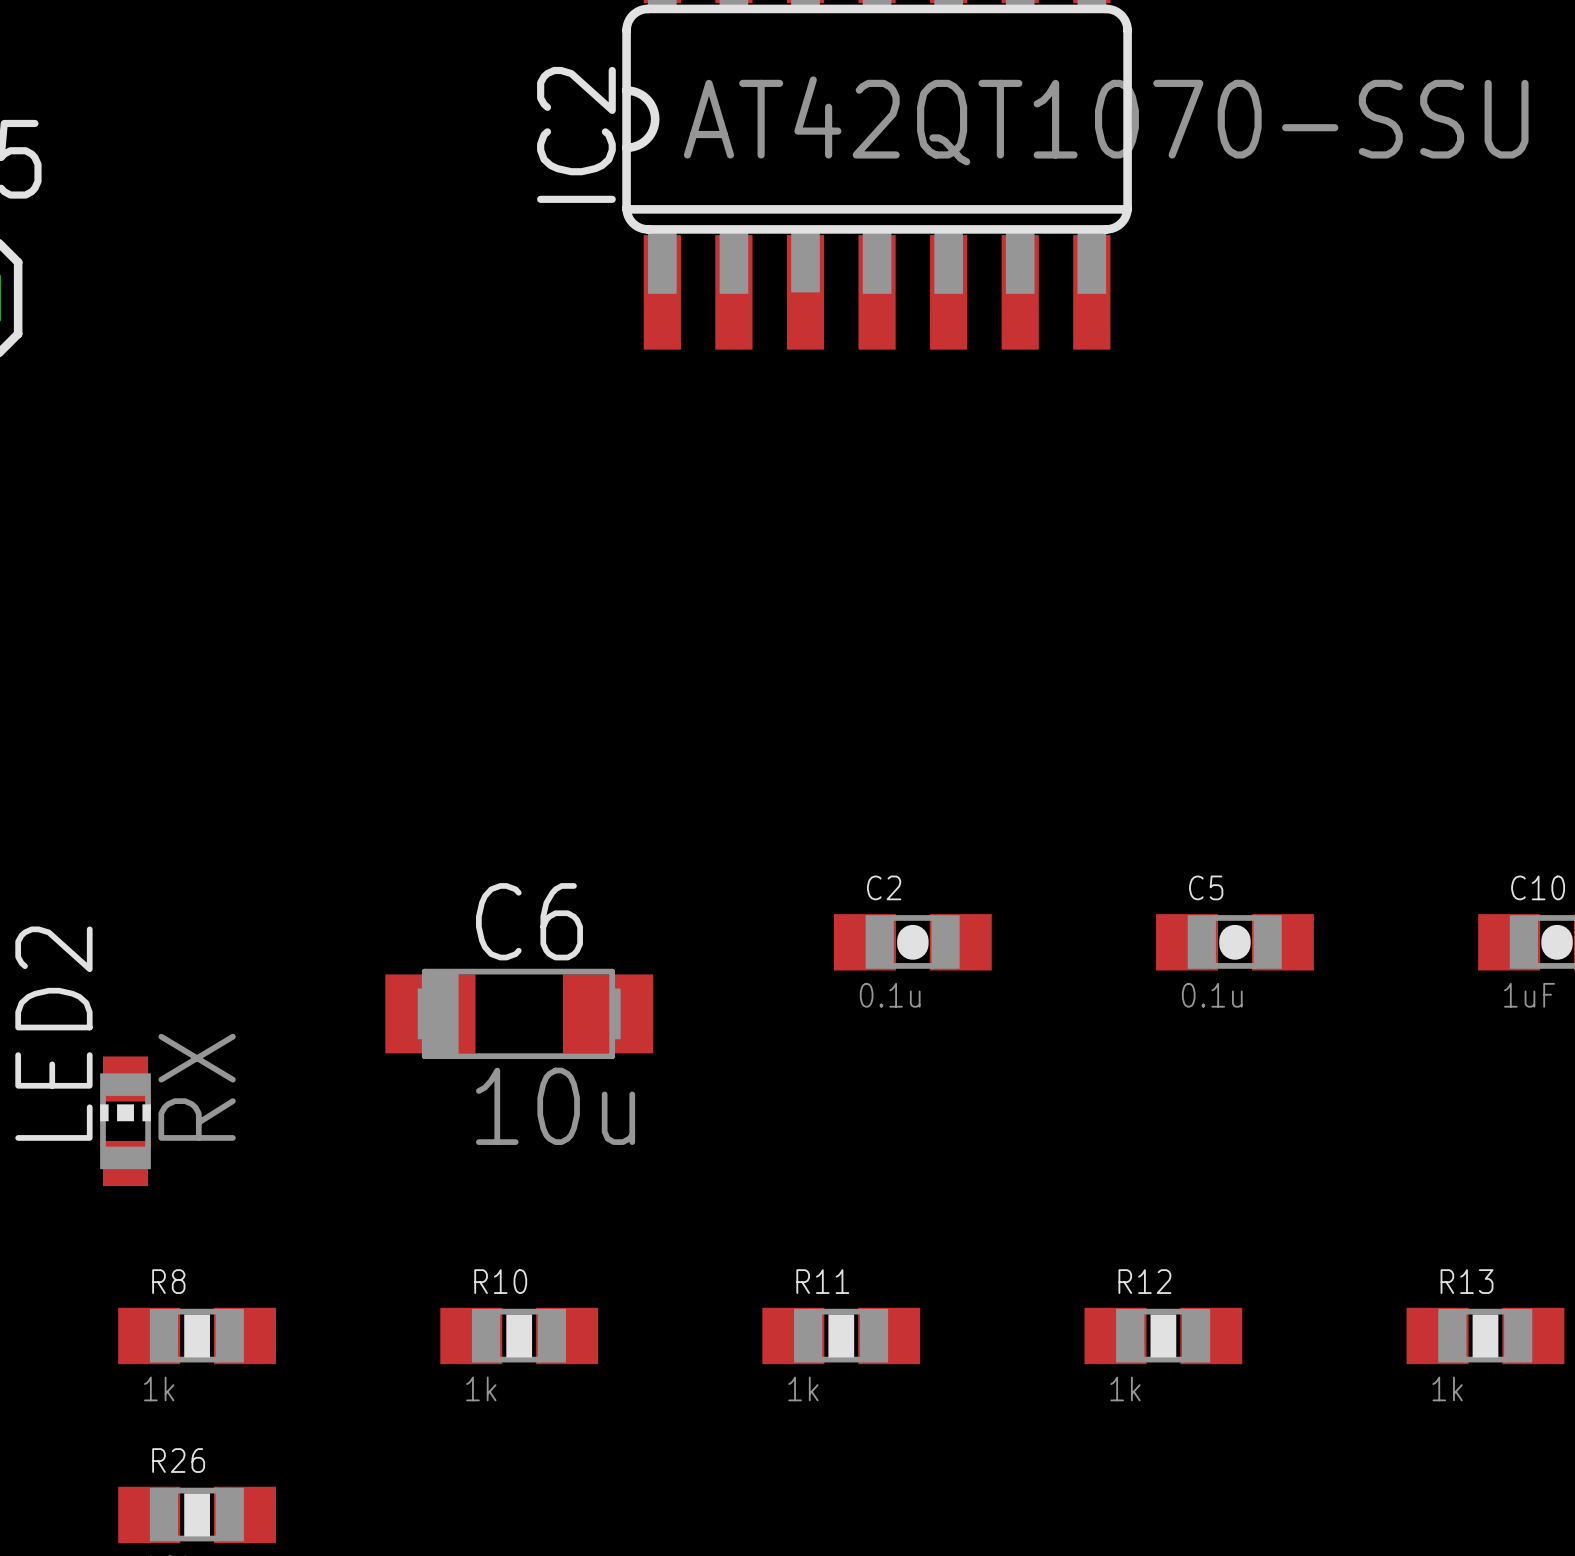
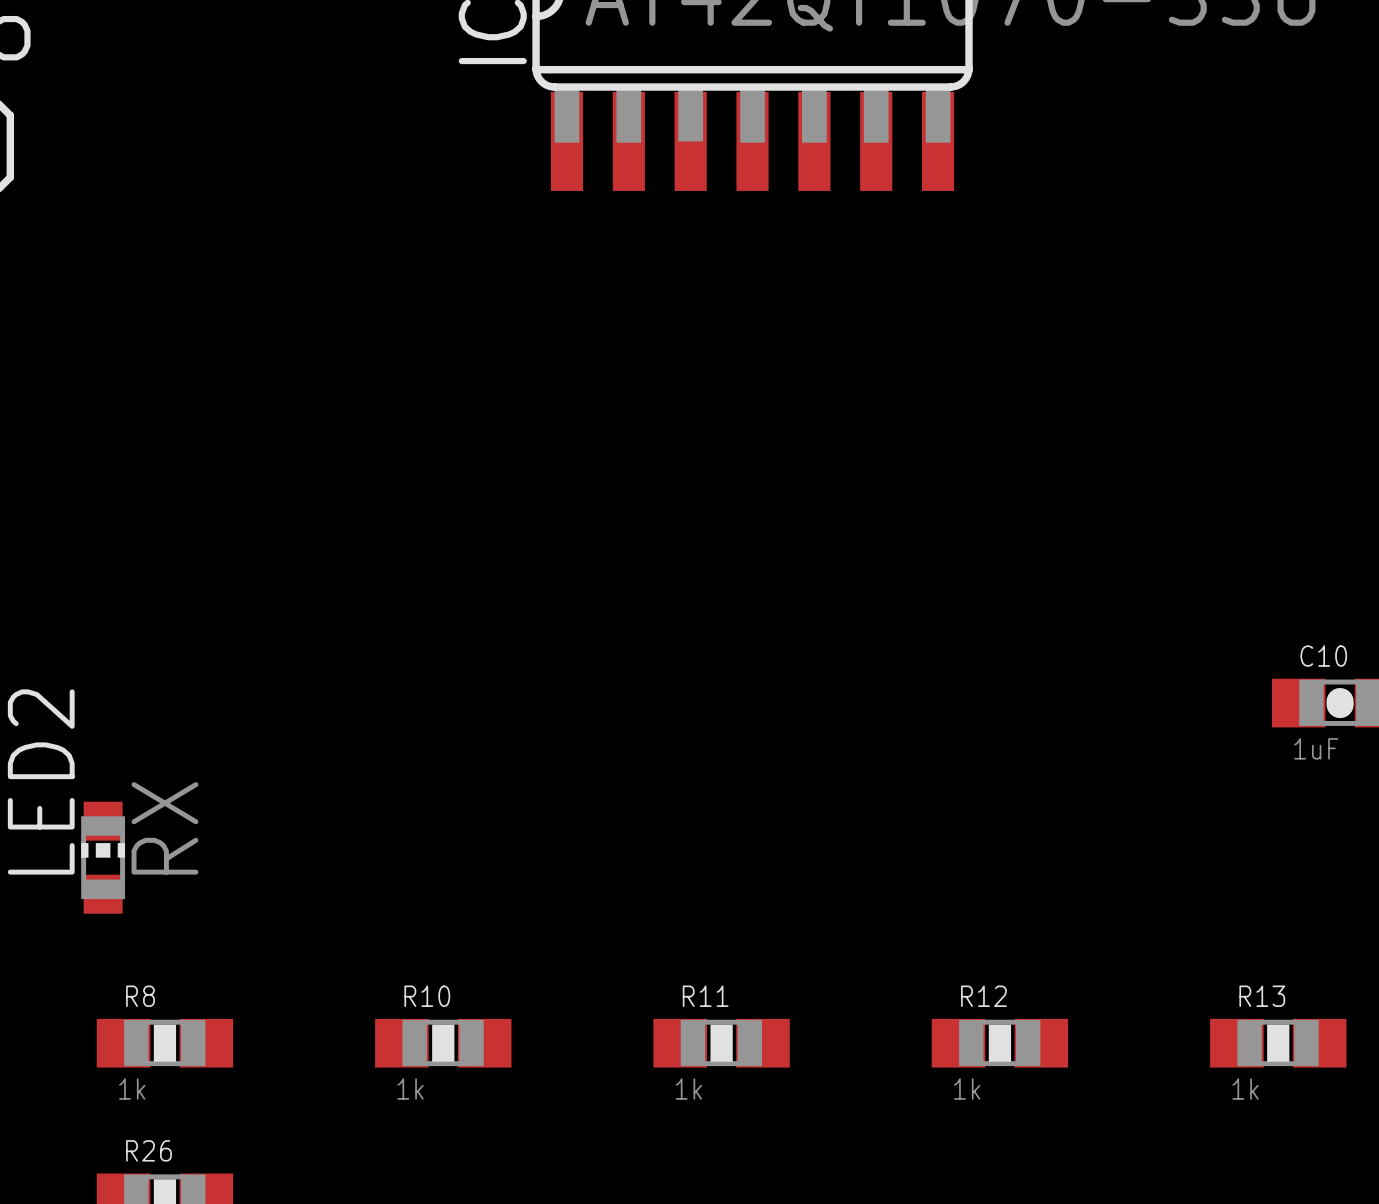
C2: 0.1u (912, 942) -> none
C5: 0.1u (1234, 942) -> none
C6: 10u (519, 1013) -> none

